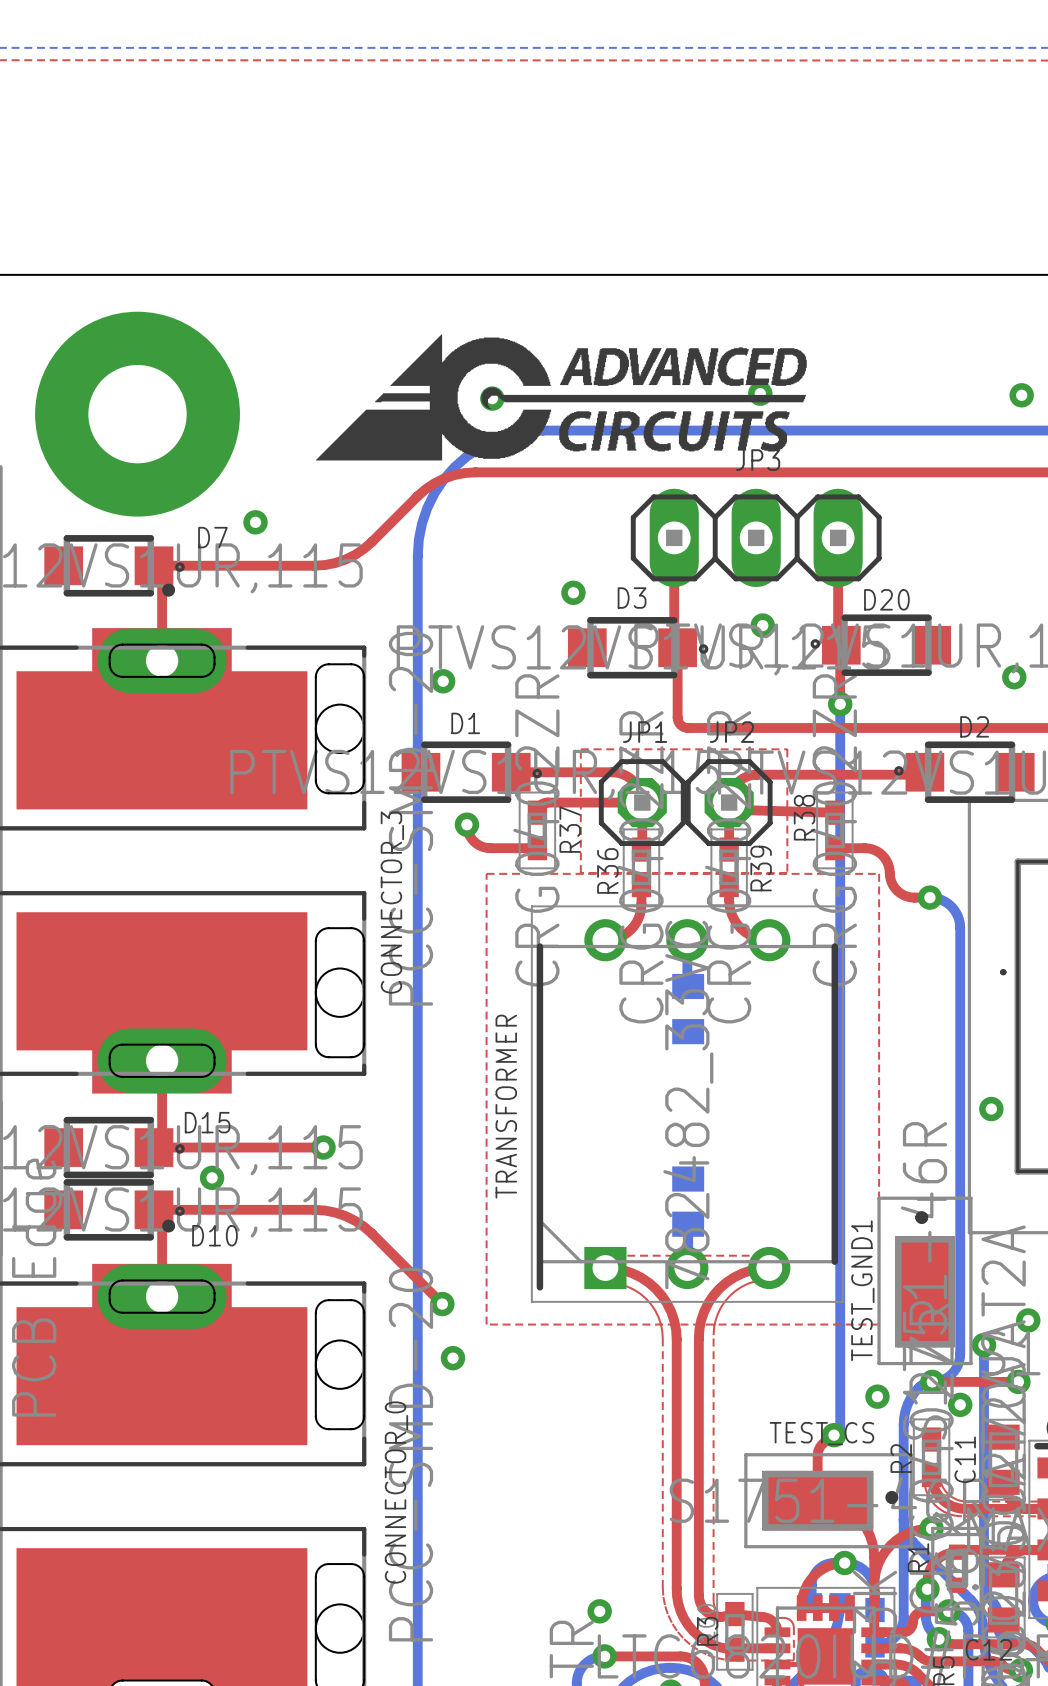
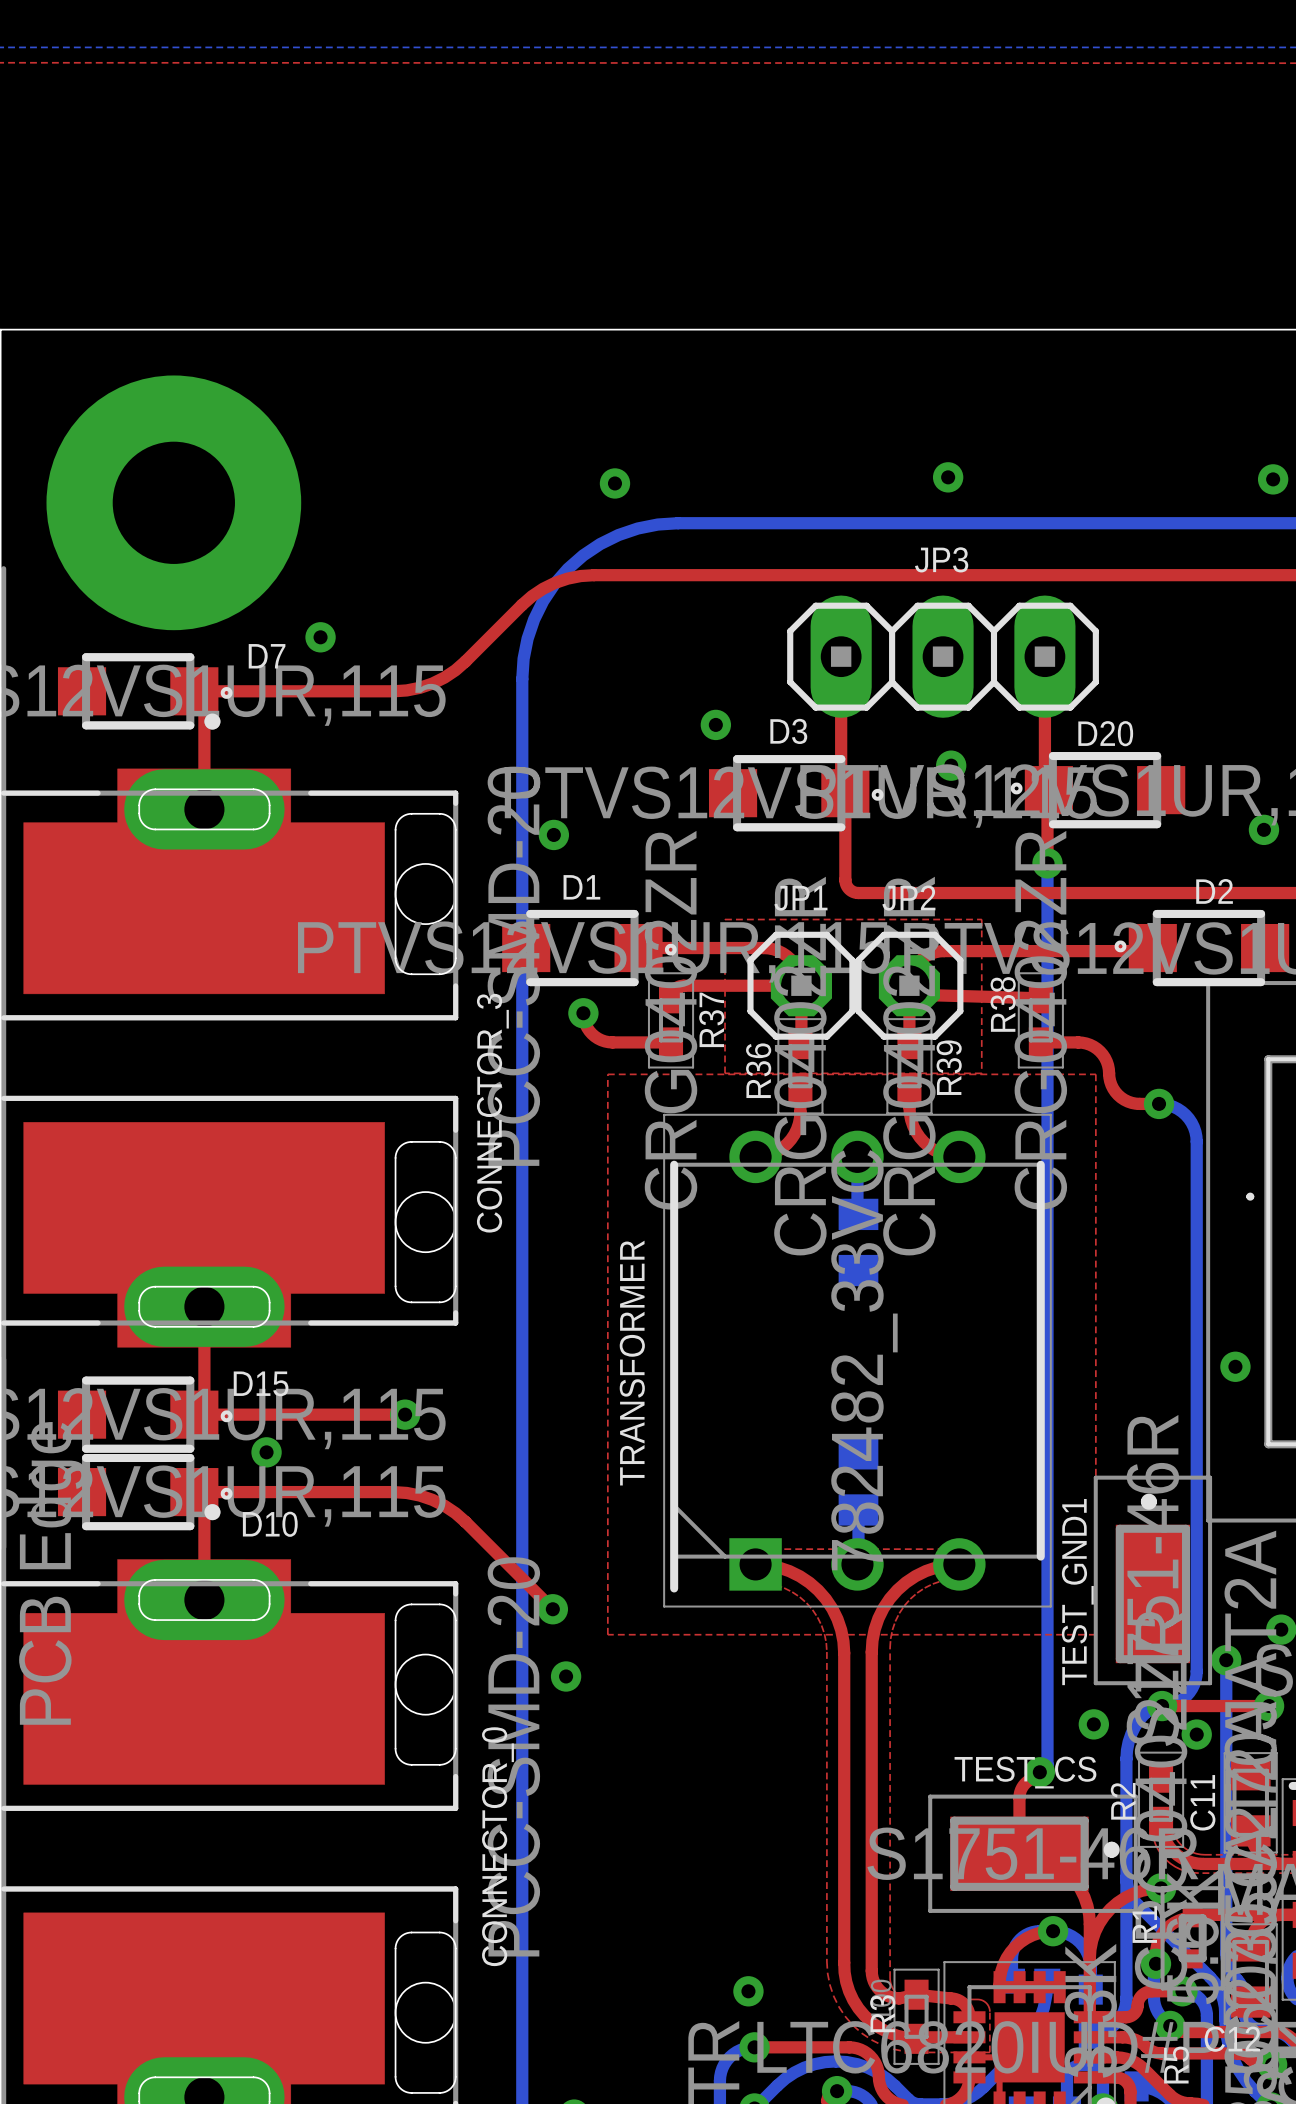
drawing: [315, 334, 807, 461] -> none

